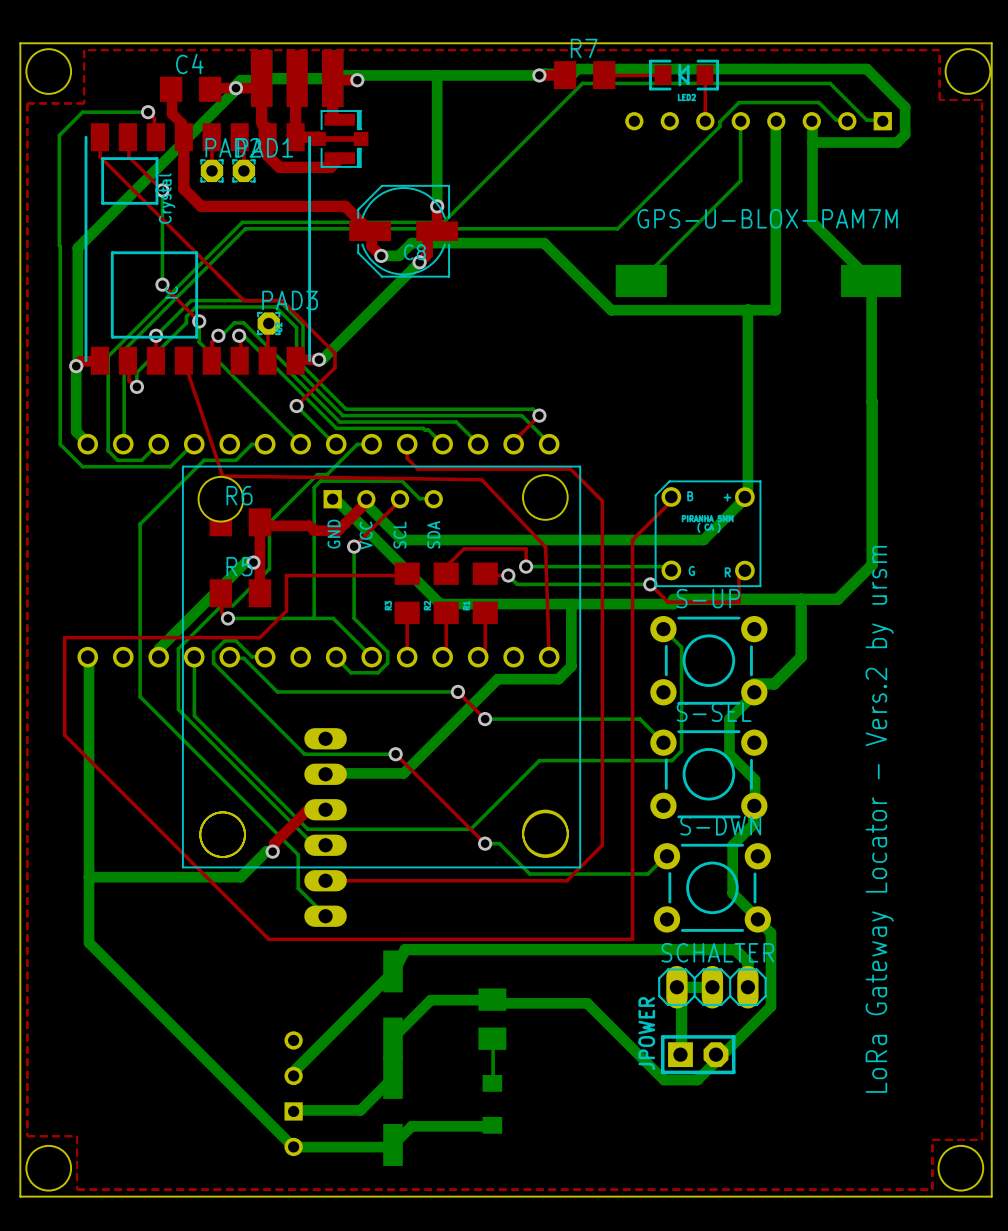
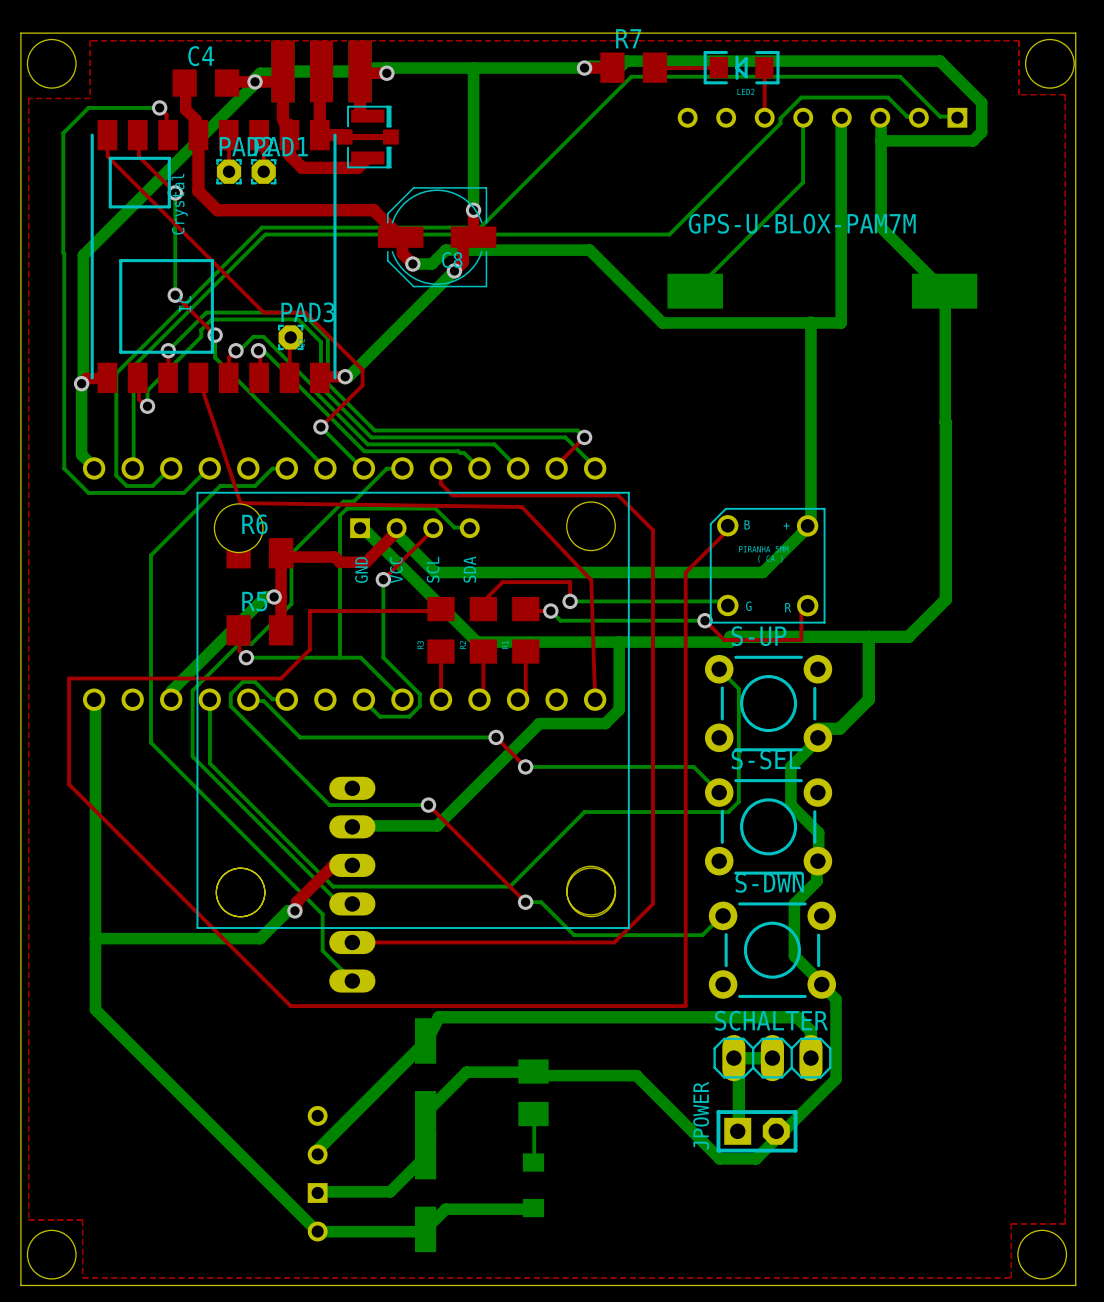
text: LoRa Gateway Locator - Vers.2 by ursm (879, 819) -> none

